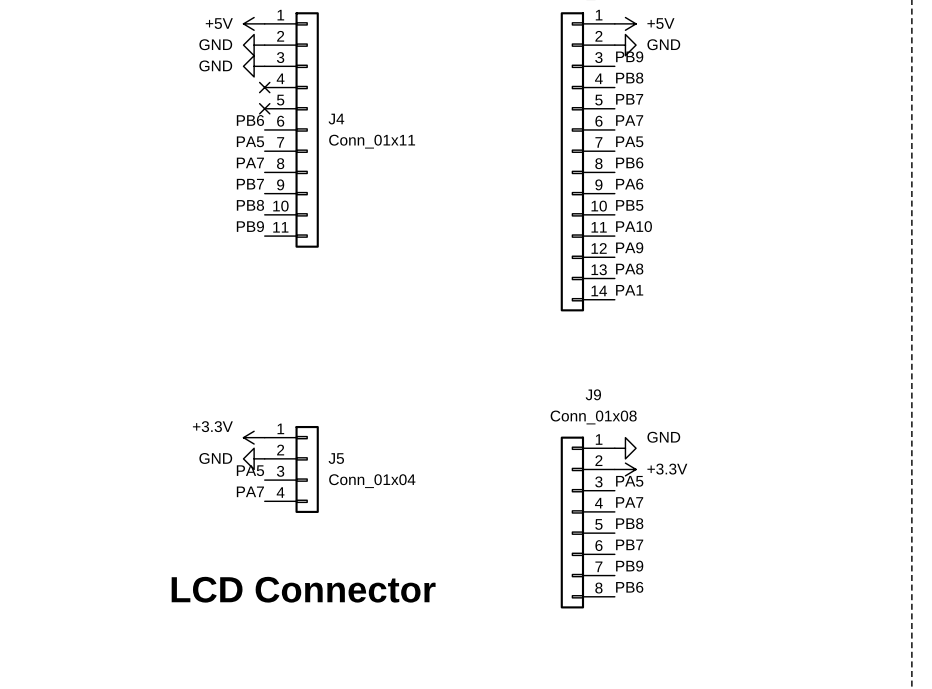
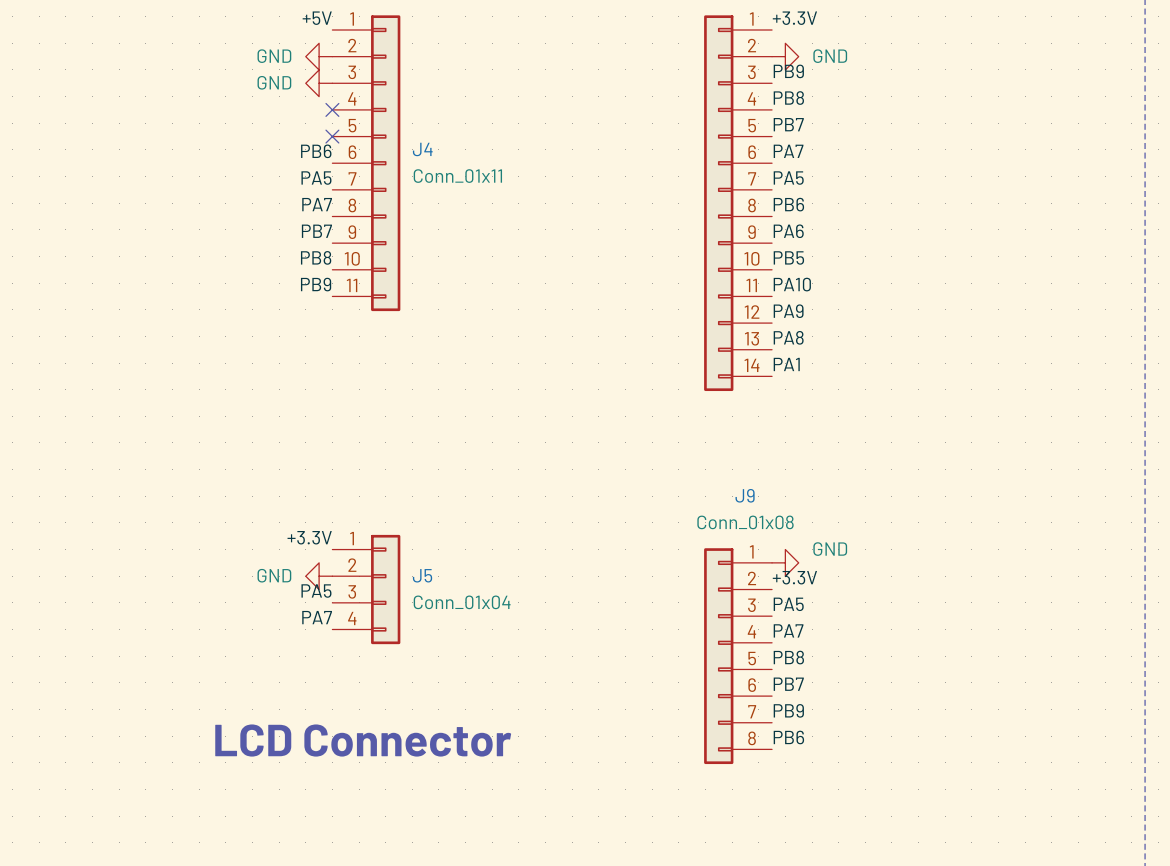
label: none -> +5V (317, 18)
label: none -> +3.3V (794, 18)
power symbol: +5V (254, 23) -> none
power symbol: +5V (625, 23) -> none
label: none -> +3.3V (309, 537)
power symbol: +3.3V (254, 437) -> none
label: none -> +3.3V (794, 577)
power symbol: +3.3V (625, 469) -> none

